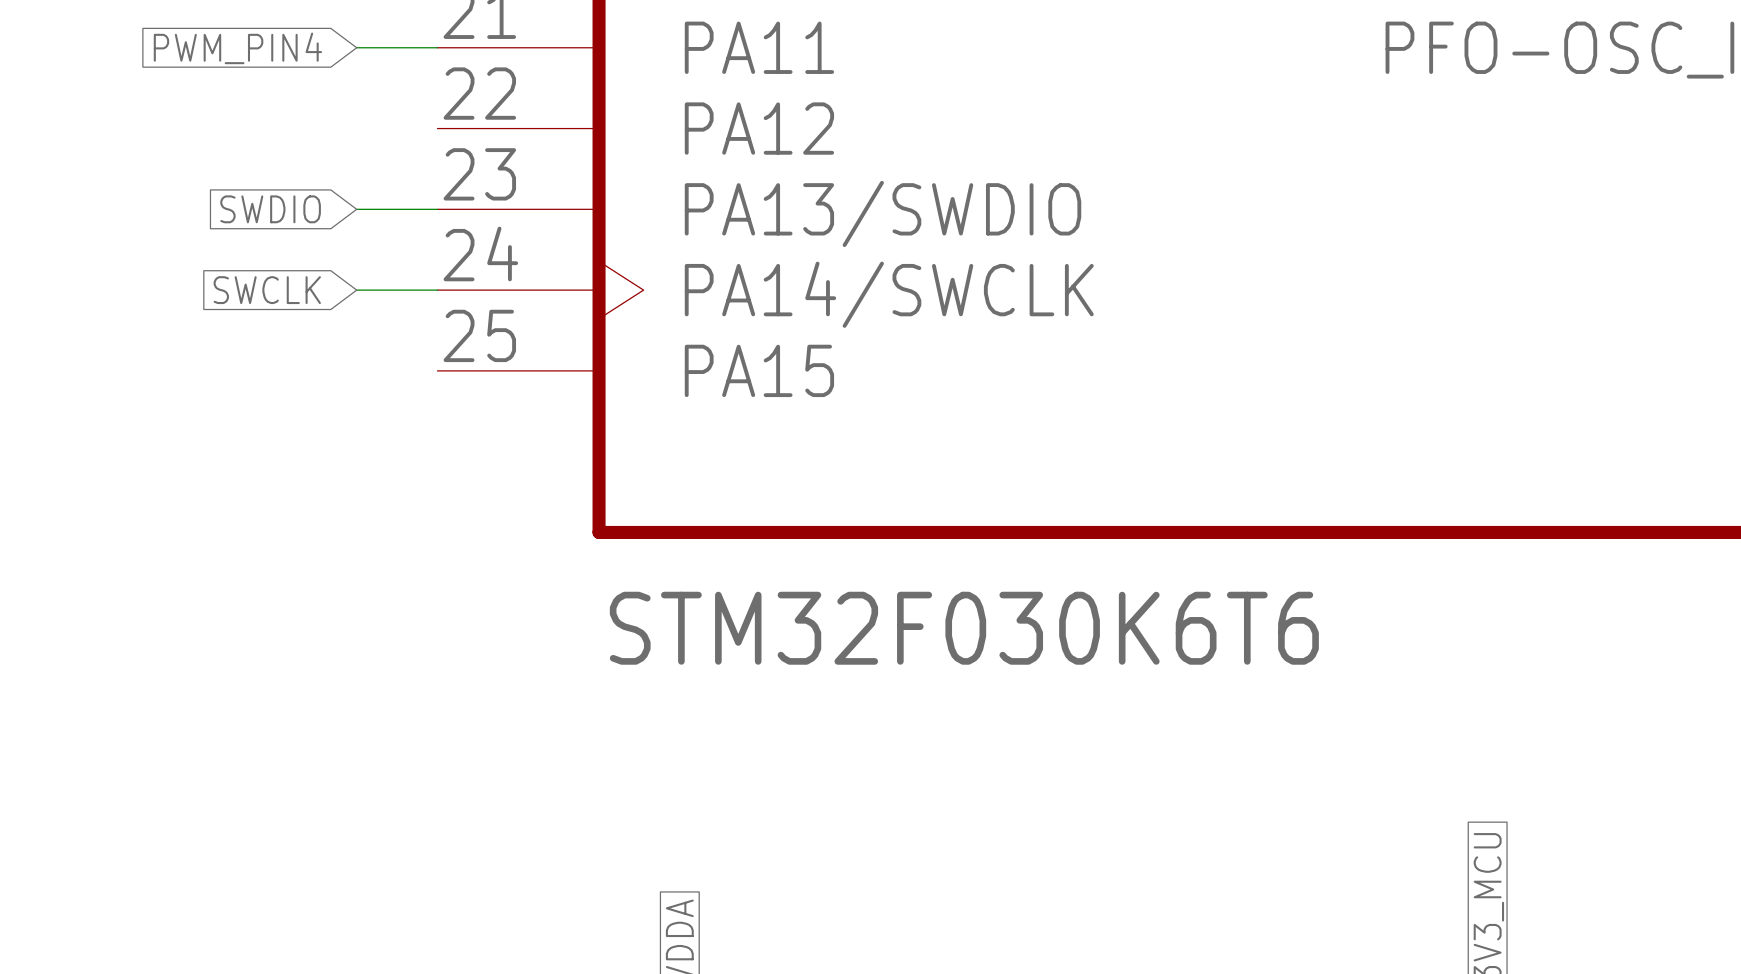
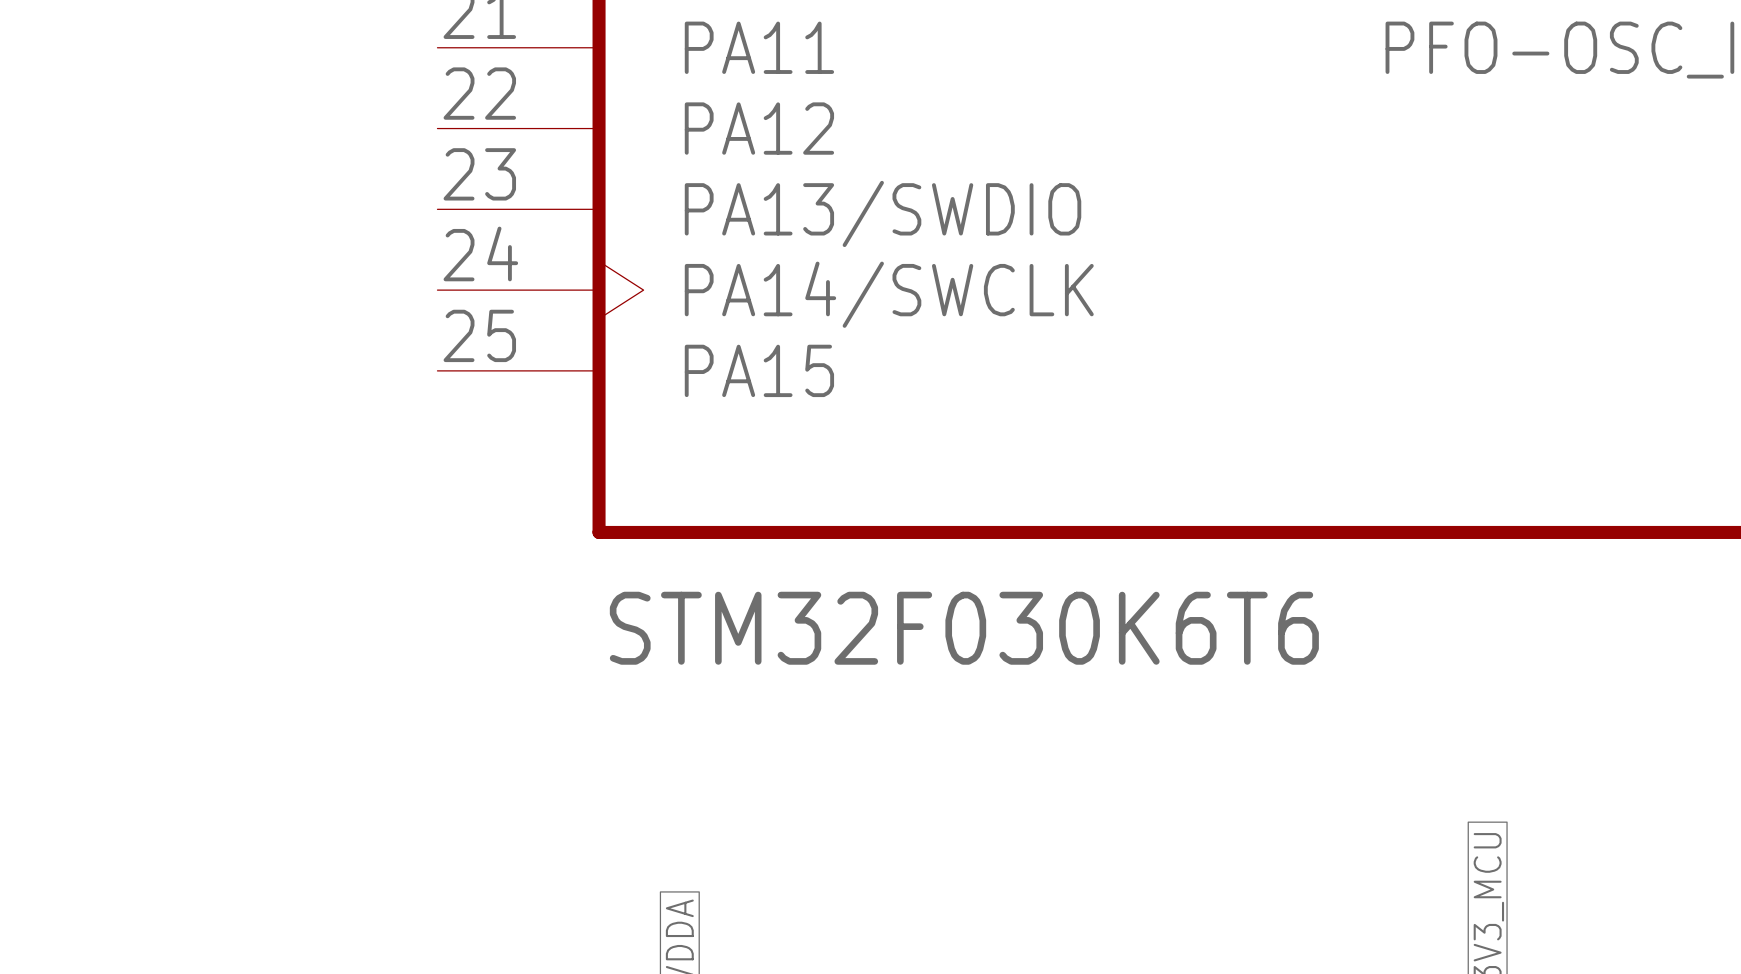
wire: (356, 47) (437, 47) -> none
global label: PWM_PIN4 (237, 48) -> none
global label: SWDIO (270, 209) -> none
wire: (356, 209) (437, 209) -> none
global label: SWCLK (267, 290) -> none
wire: (356, 290) (437, 290) -> none

